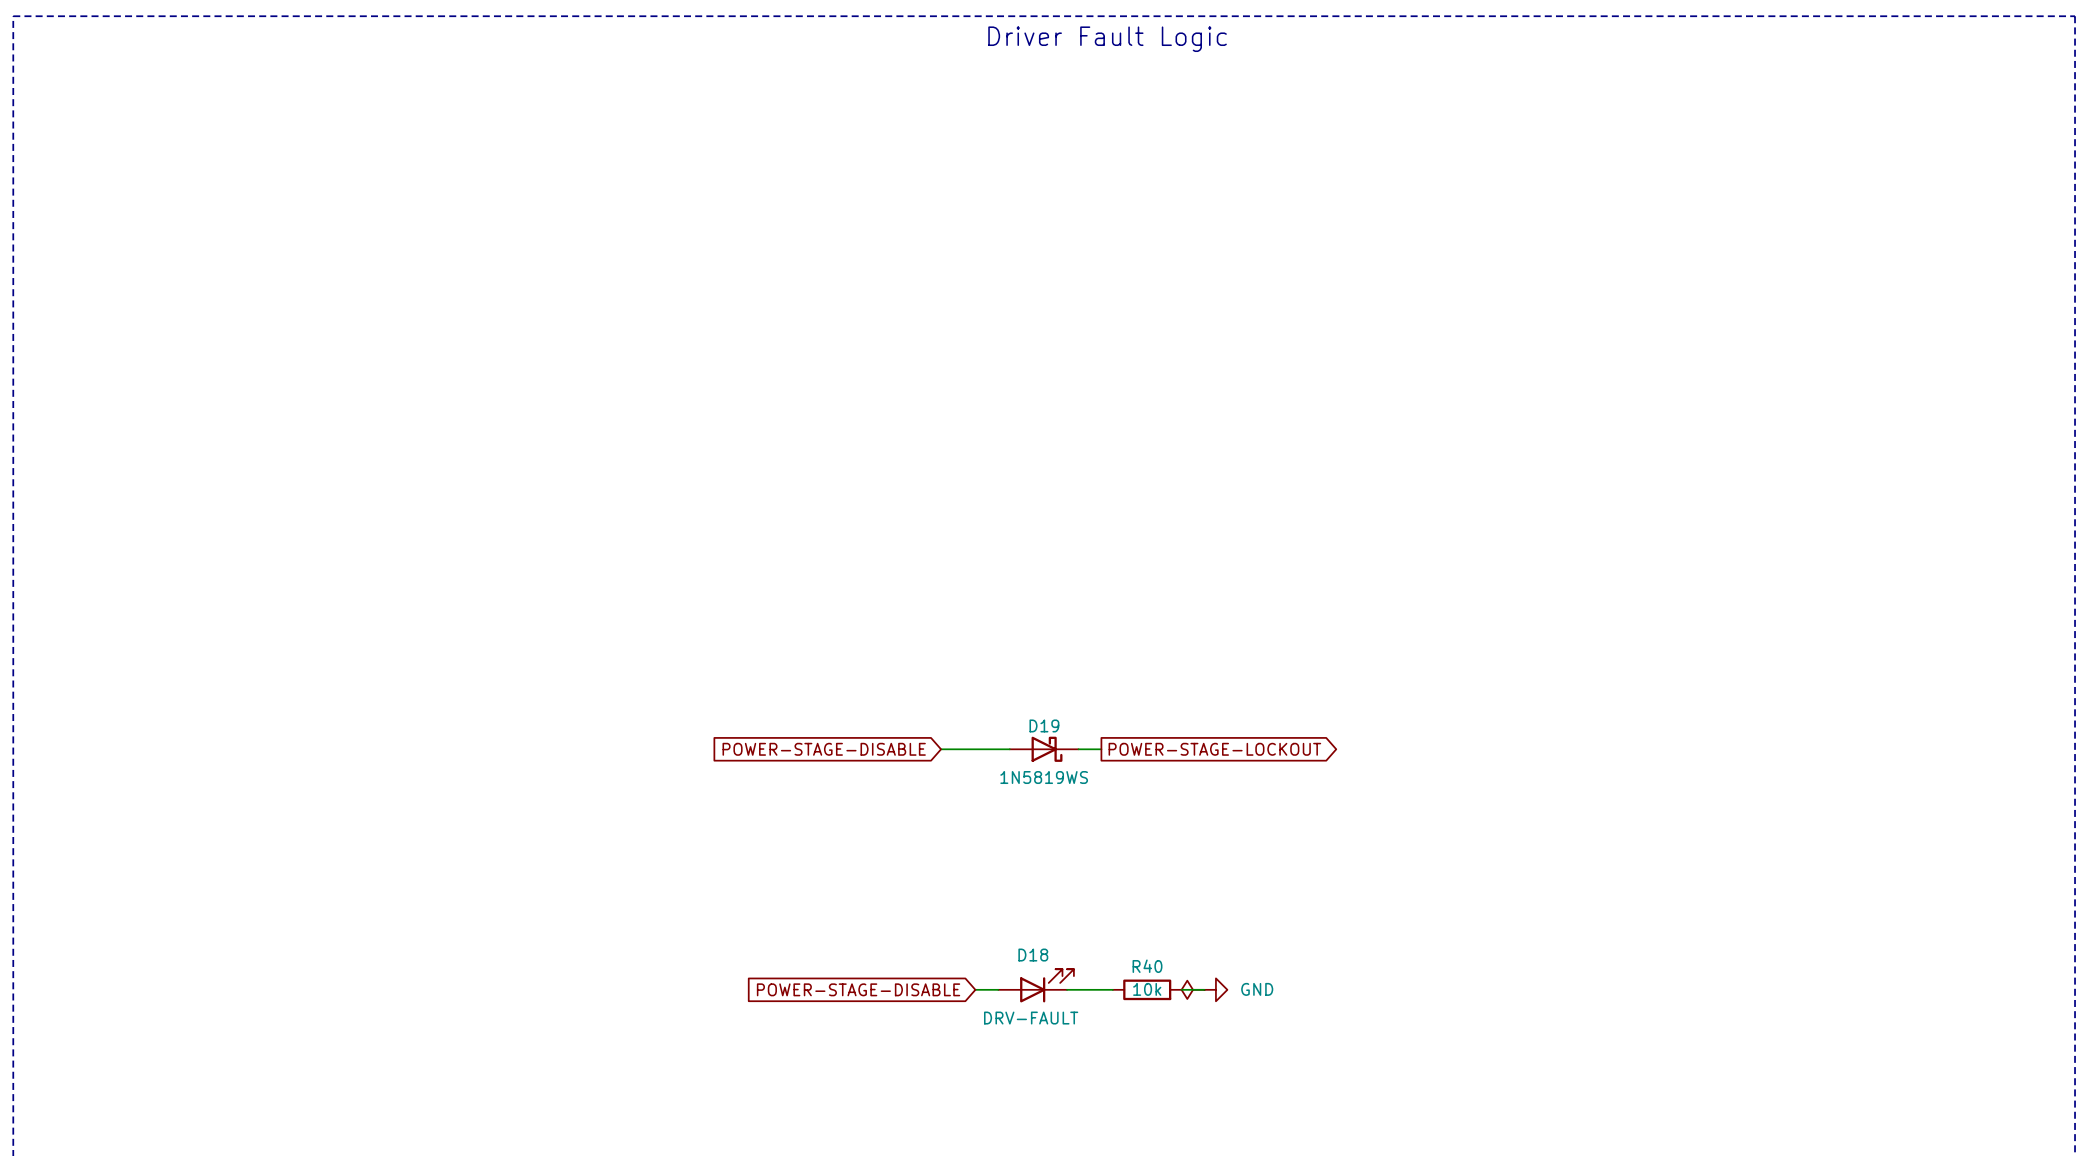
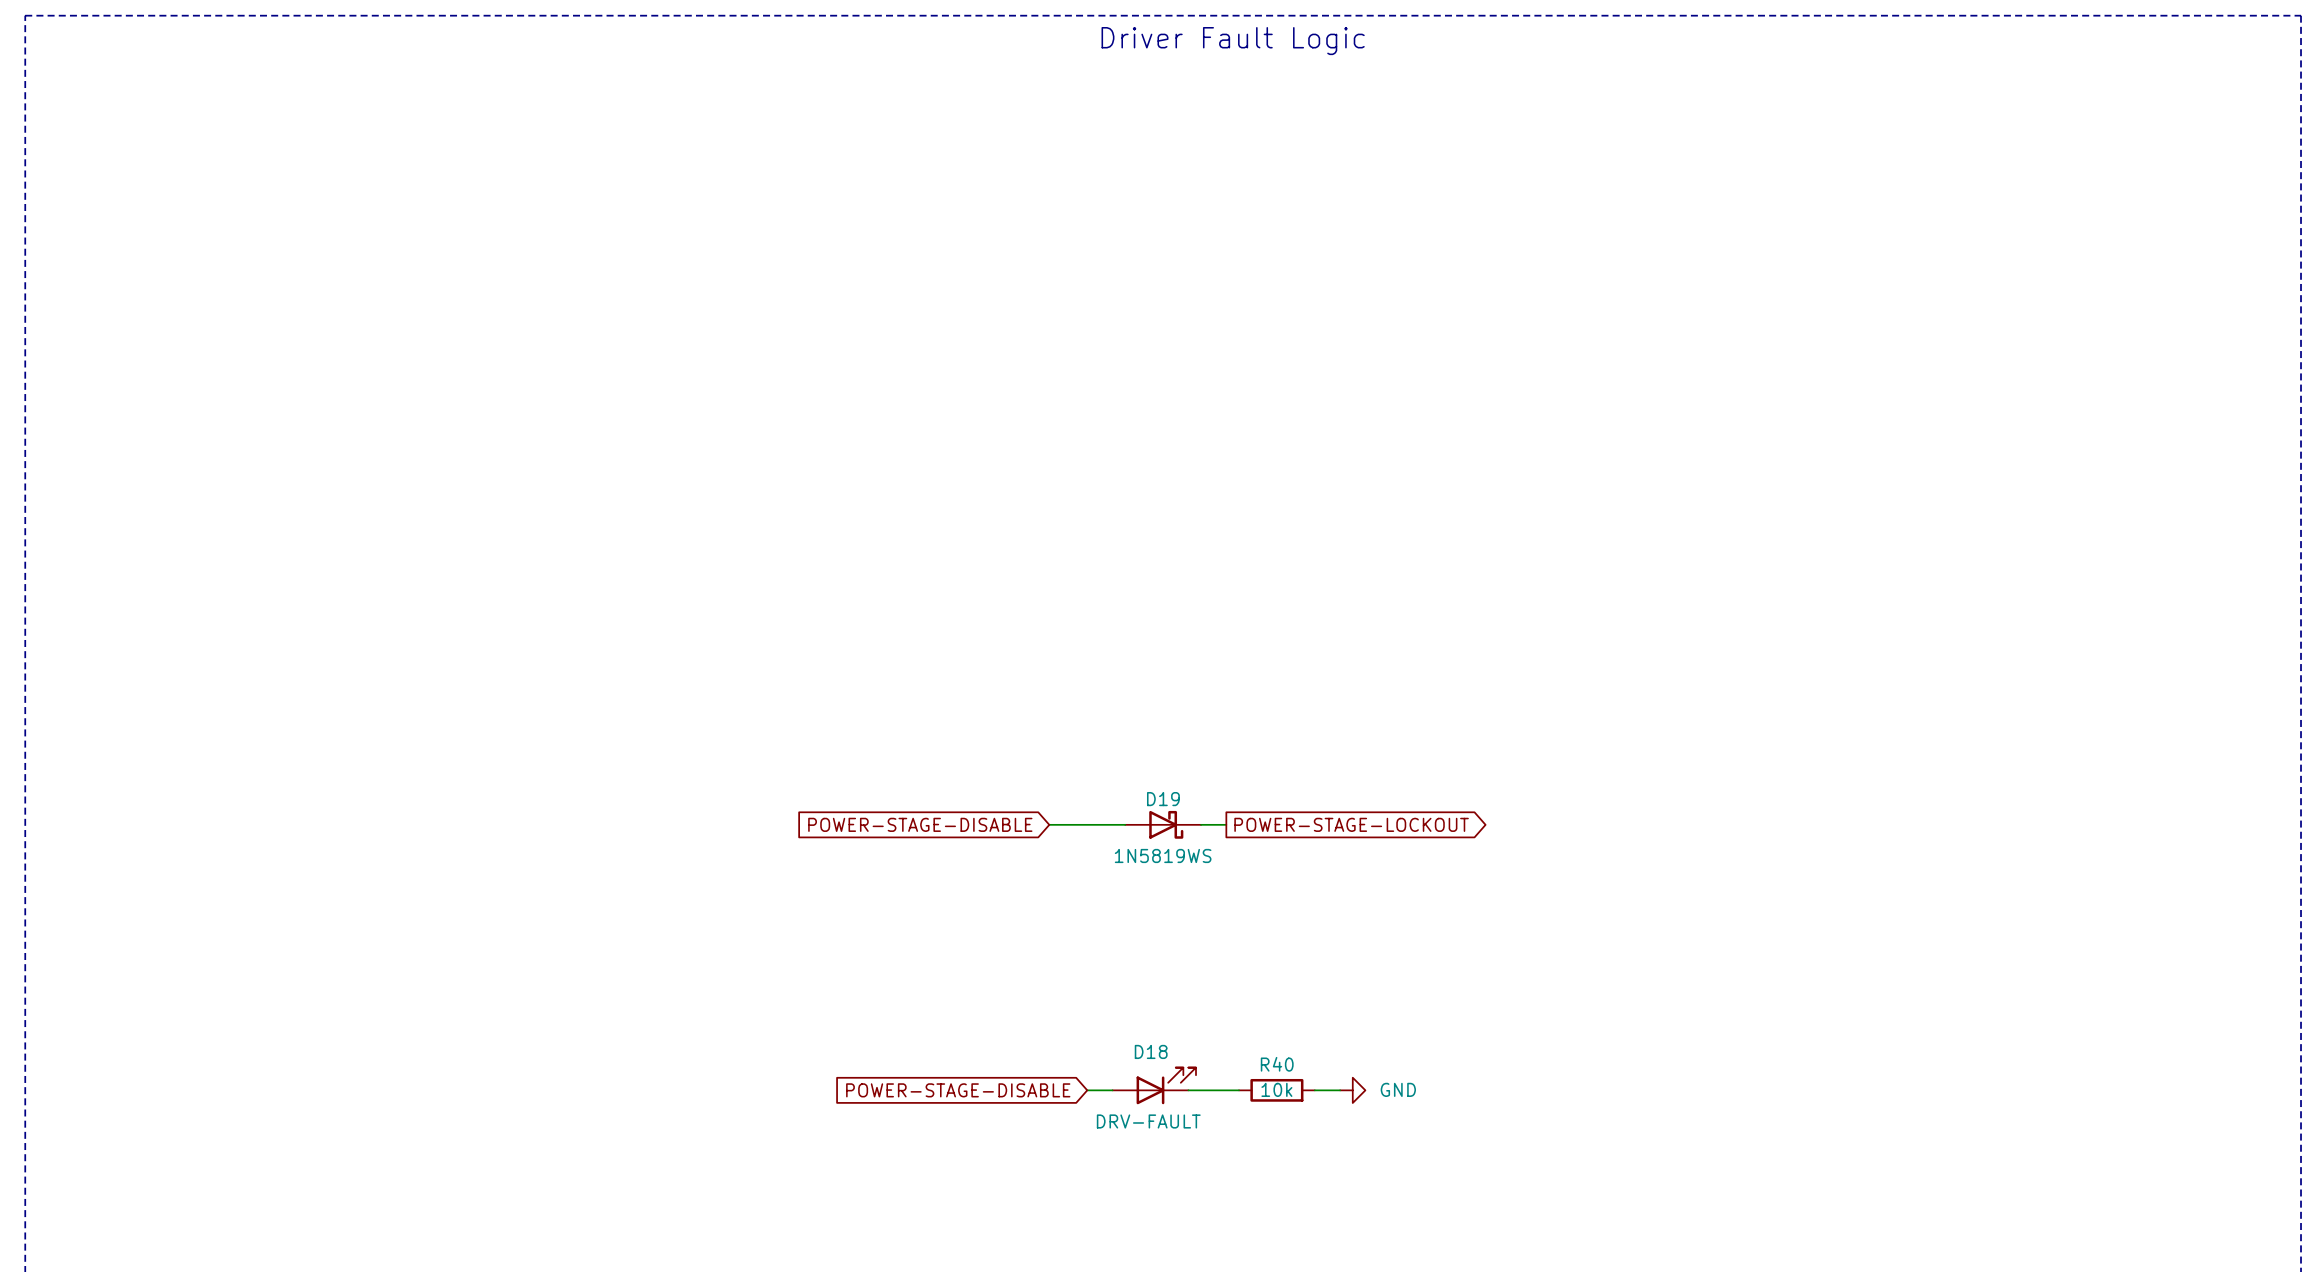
power symbol: (1193, 989) -> none

